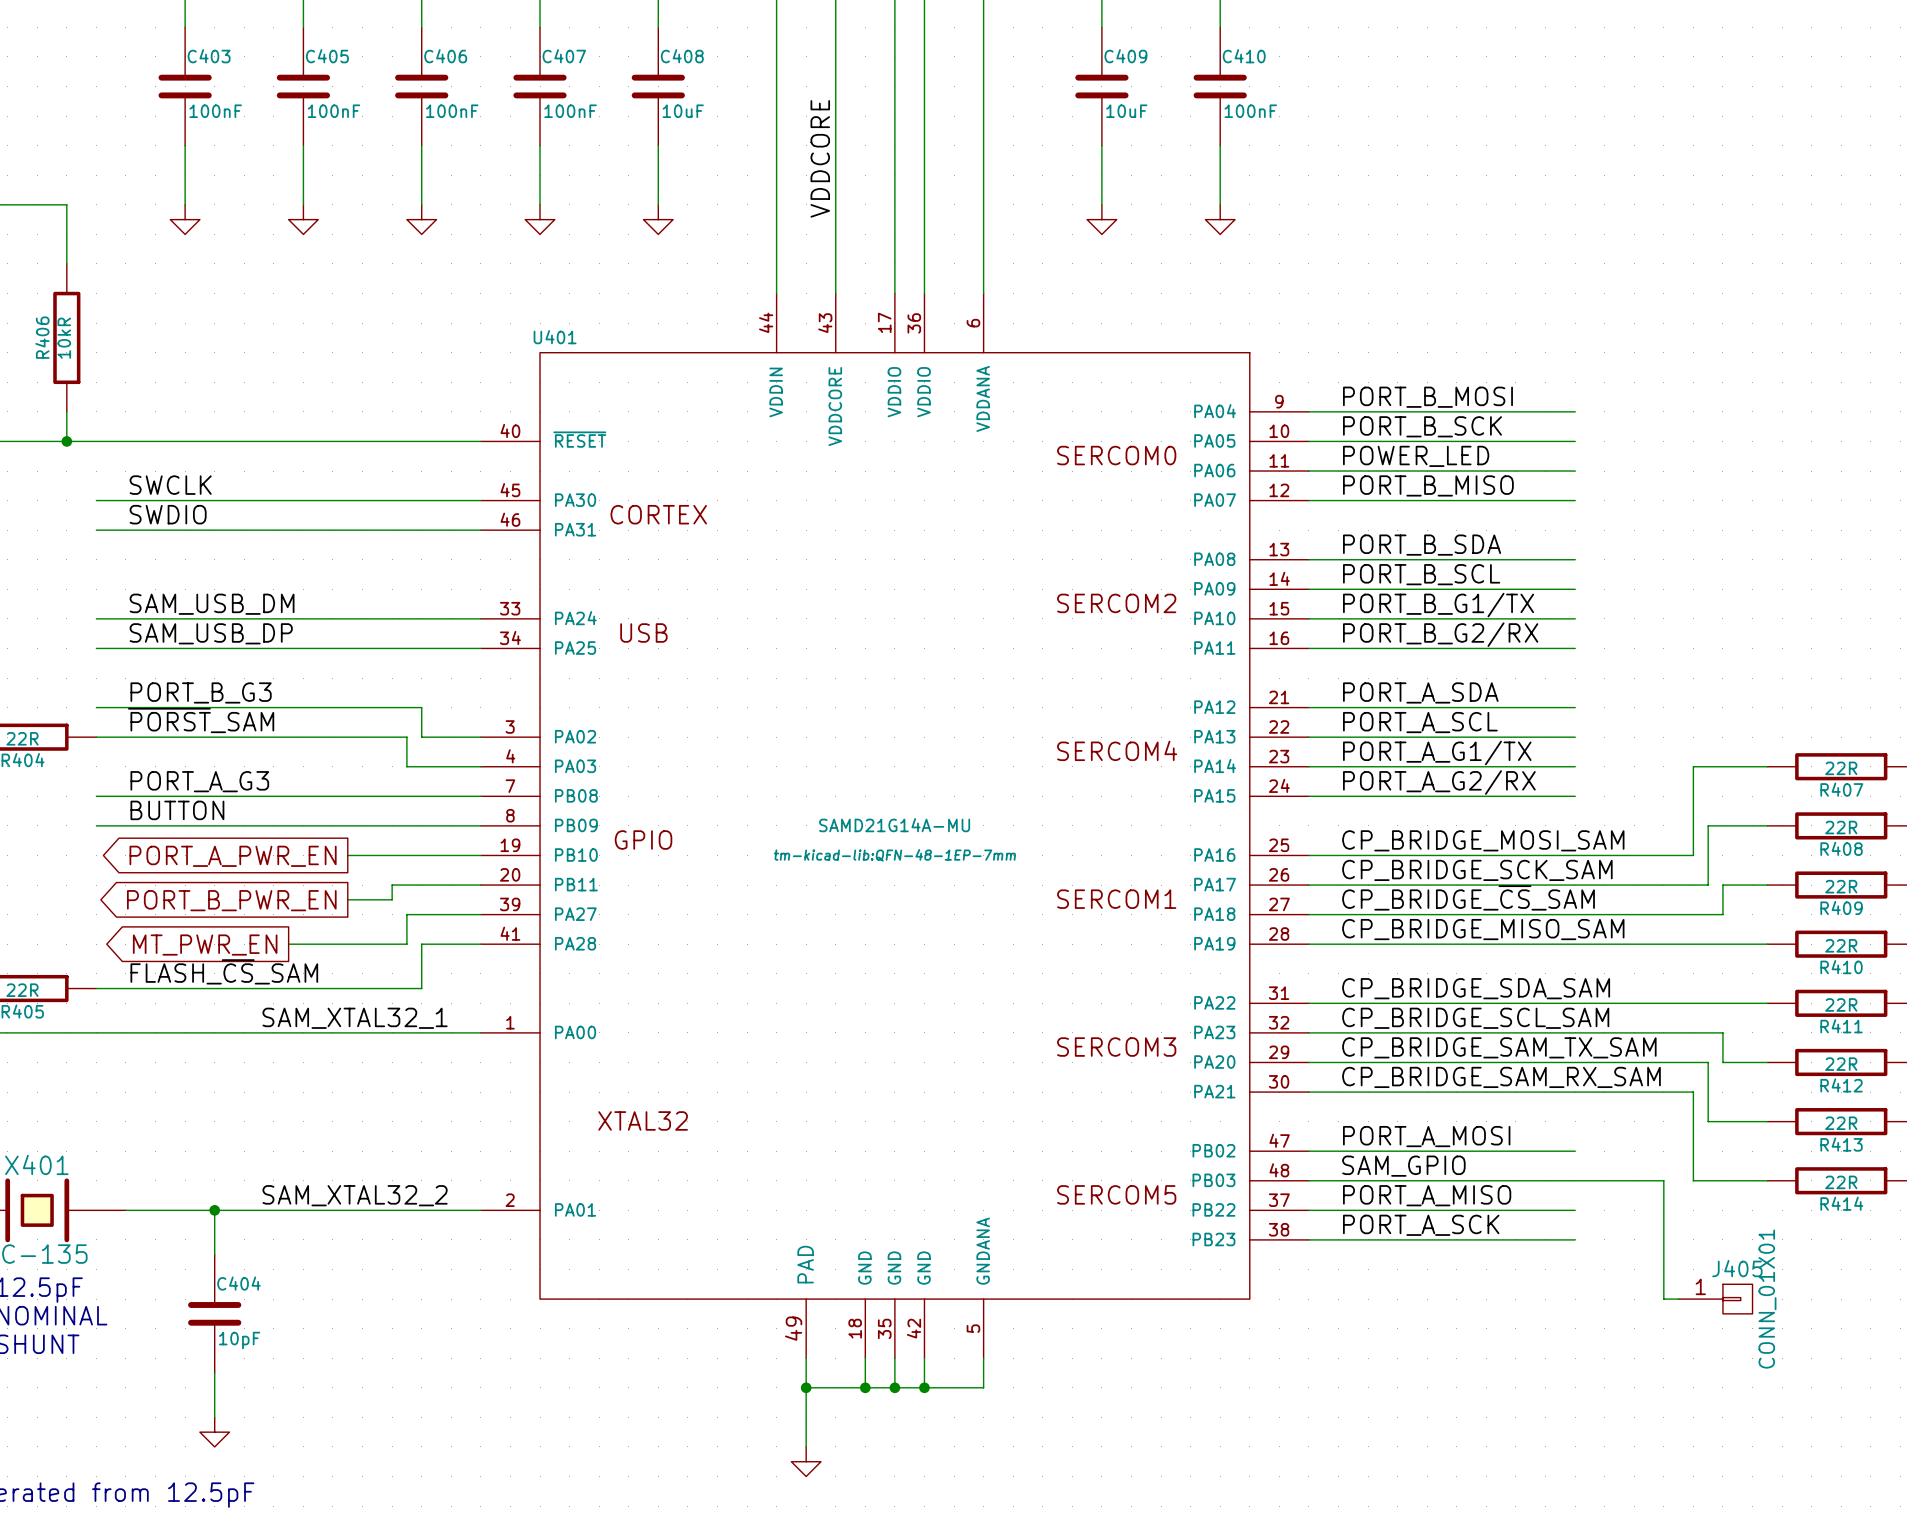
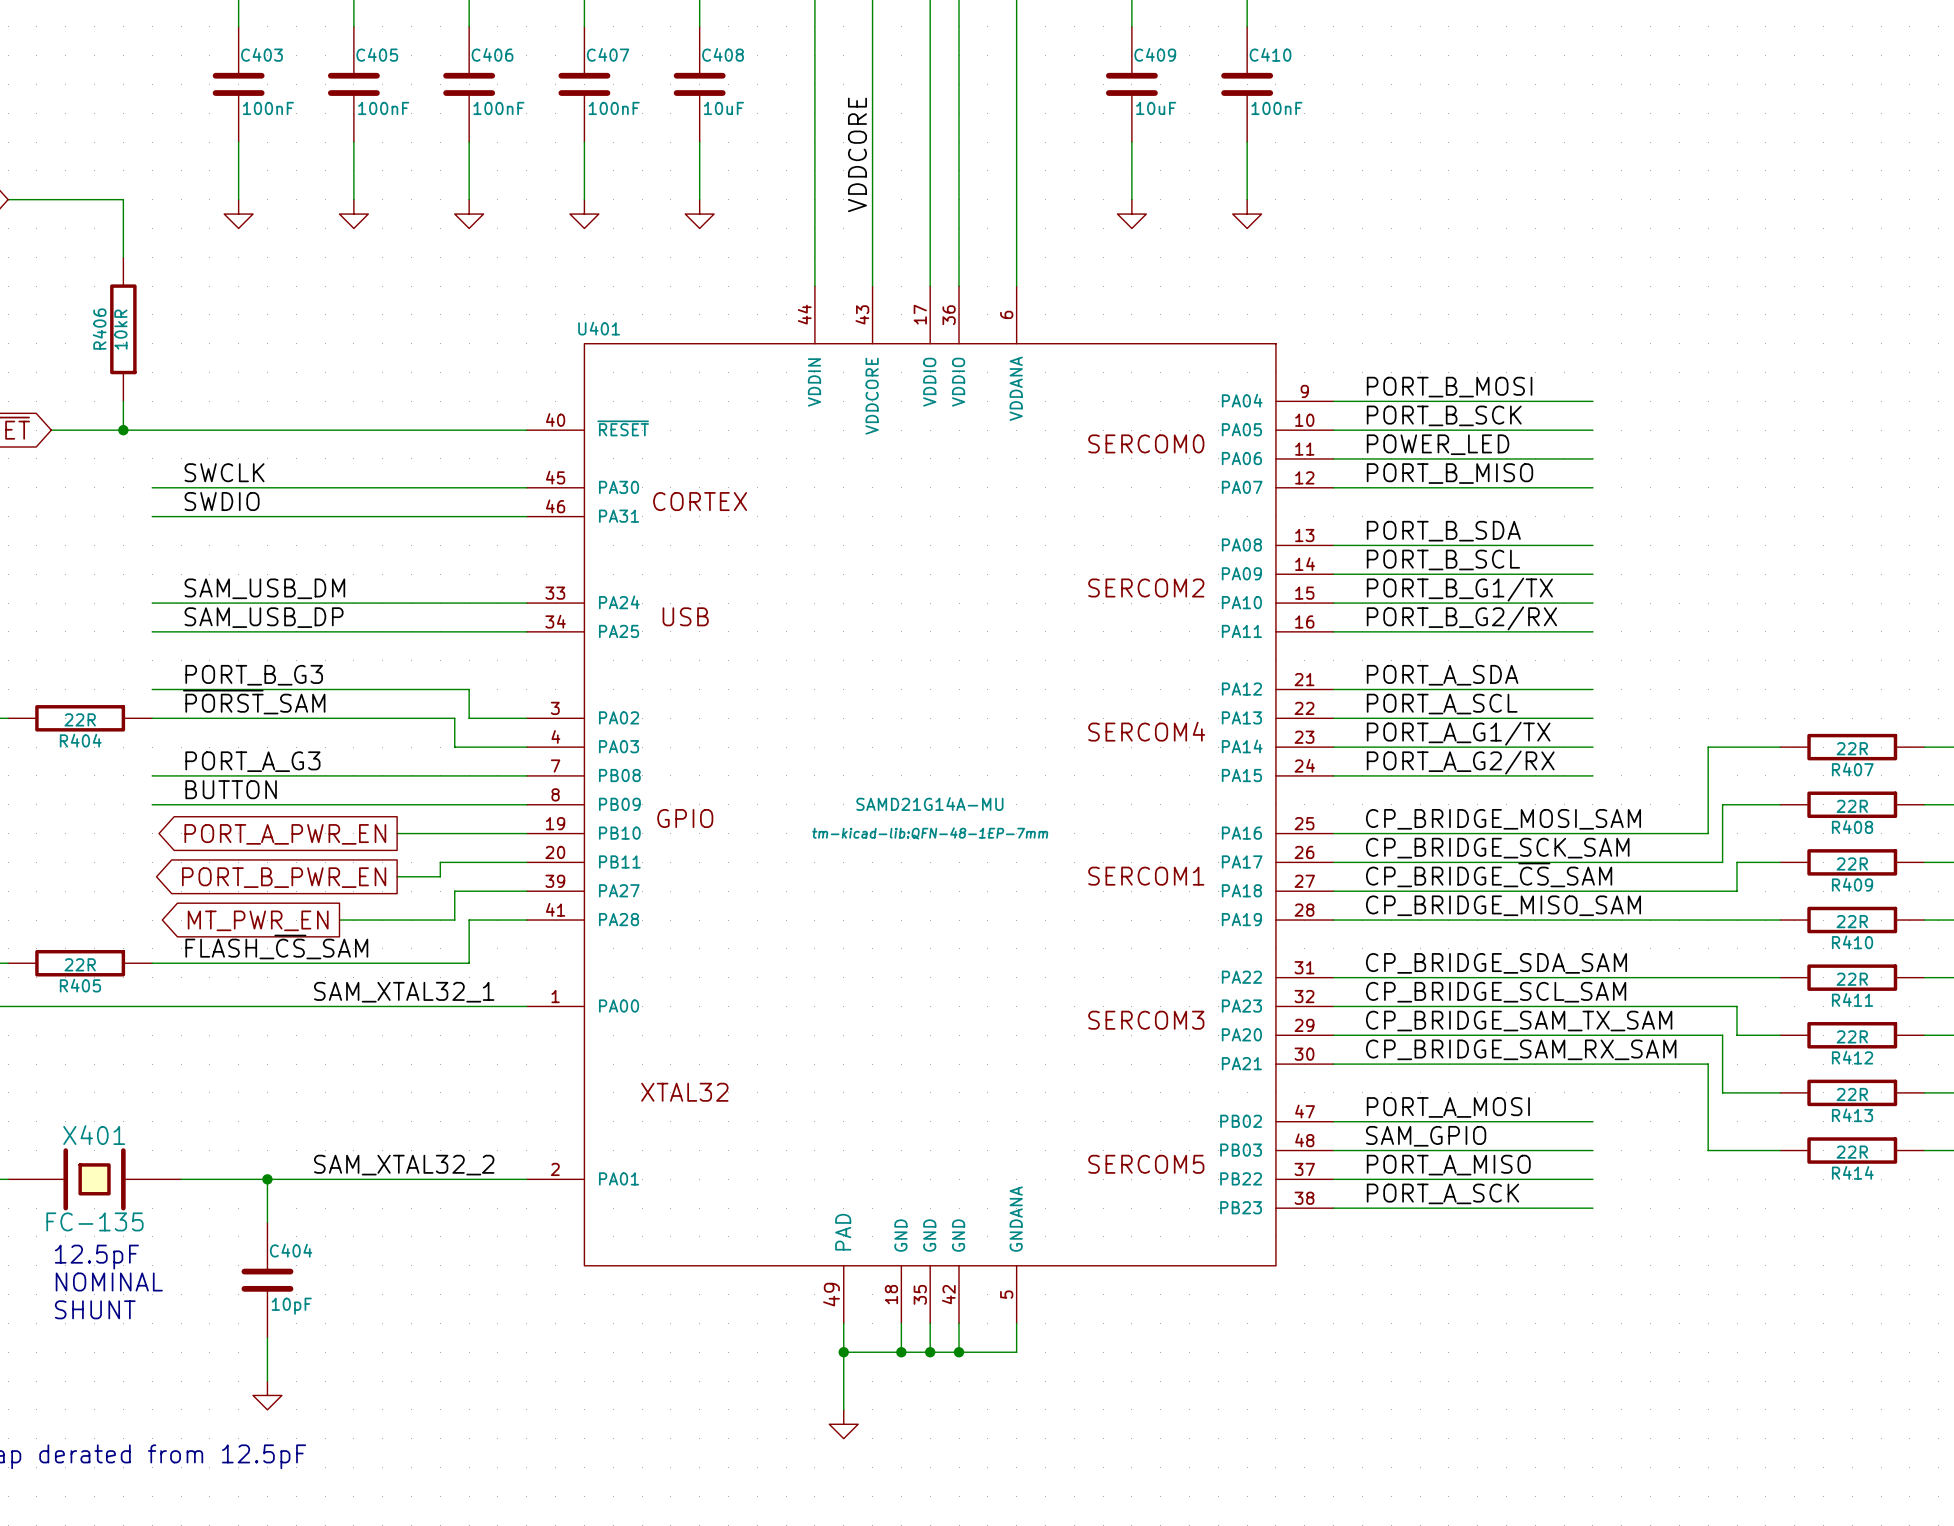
wire: (1575, 1180) (1663, 1180) (1663, 1299) (1678, 1299) -> none
J405: CONN_01X01 (1715, 1299) -> none

